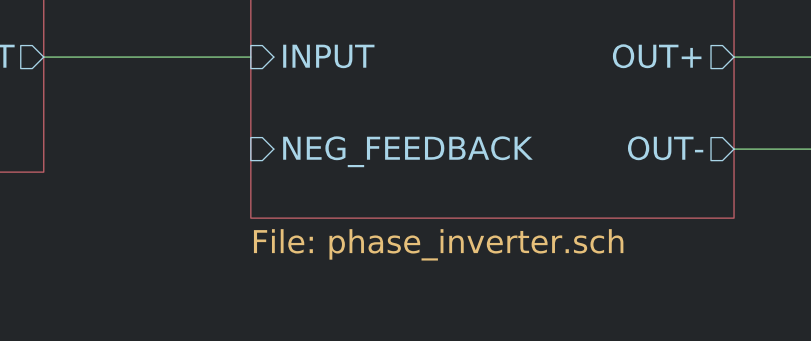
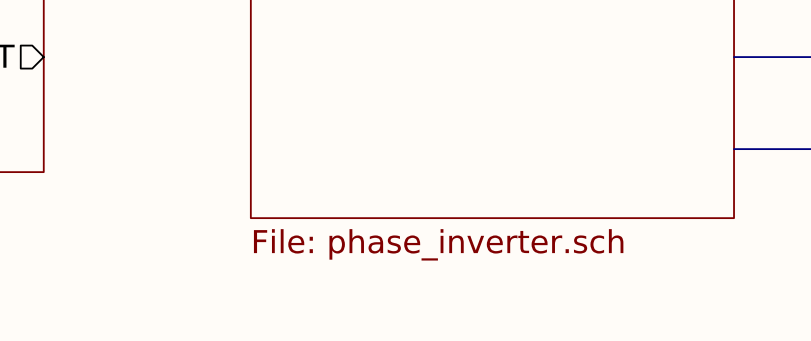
sheet pin: INPUT (328, 56) -> none
sheet pin: OUT+ (657, 56) -> none
wire: (43, 57) (250, 57) -> none
sheet pin: OUT- (665, 148) -> none
sheet pin: NEG_FEEDBACK (407, 151) -> none

